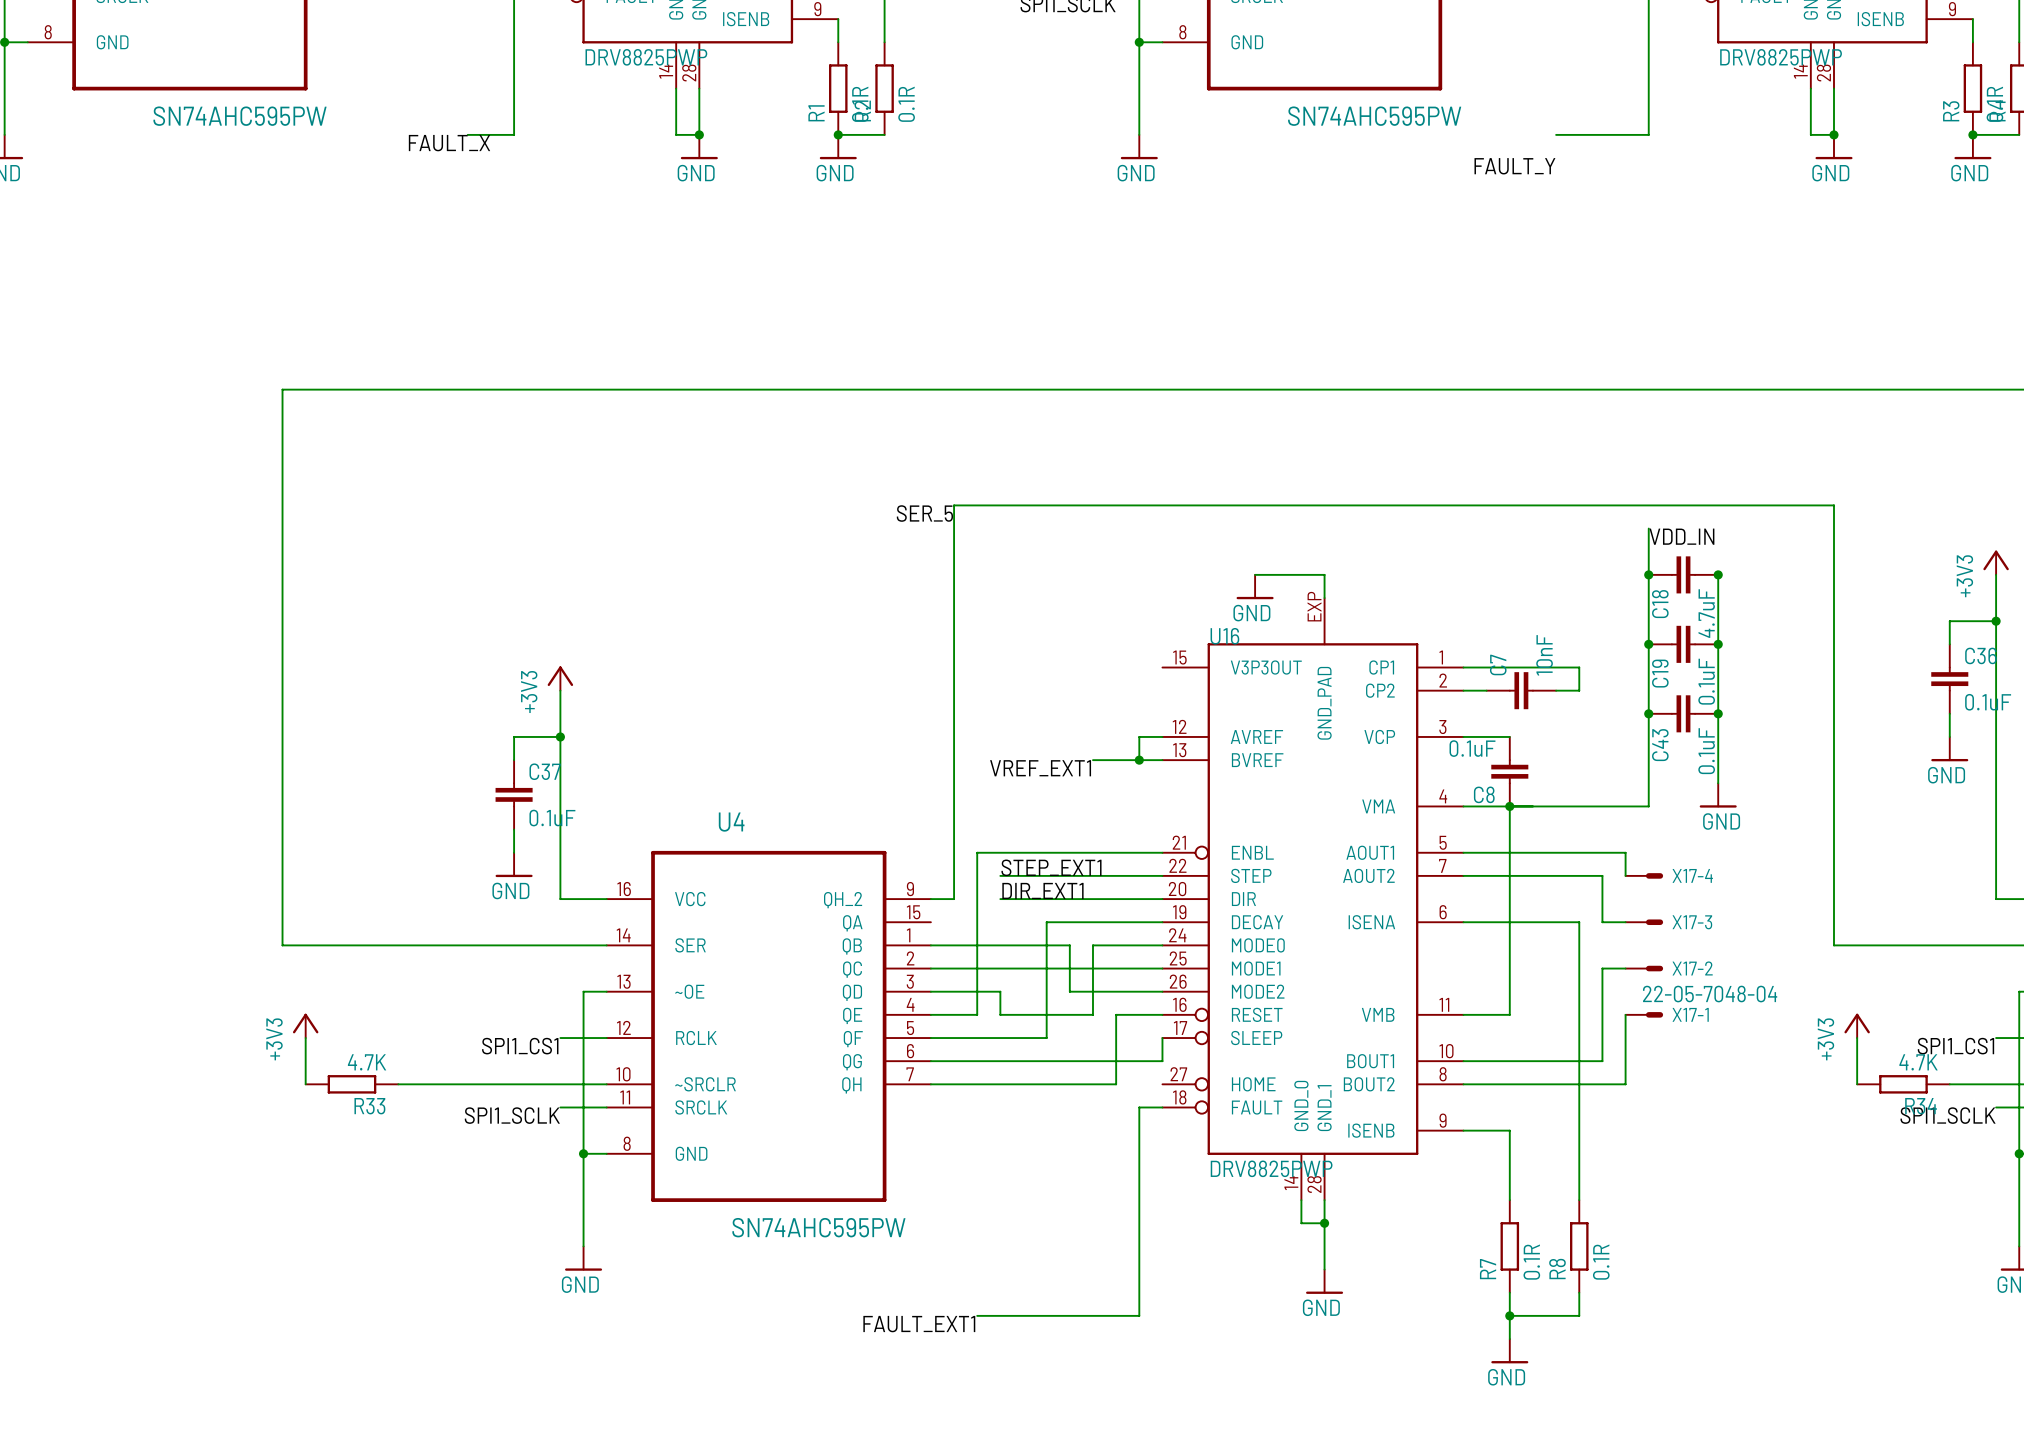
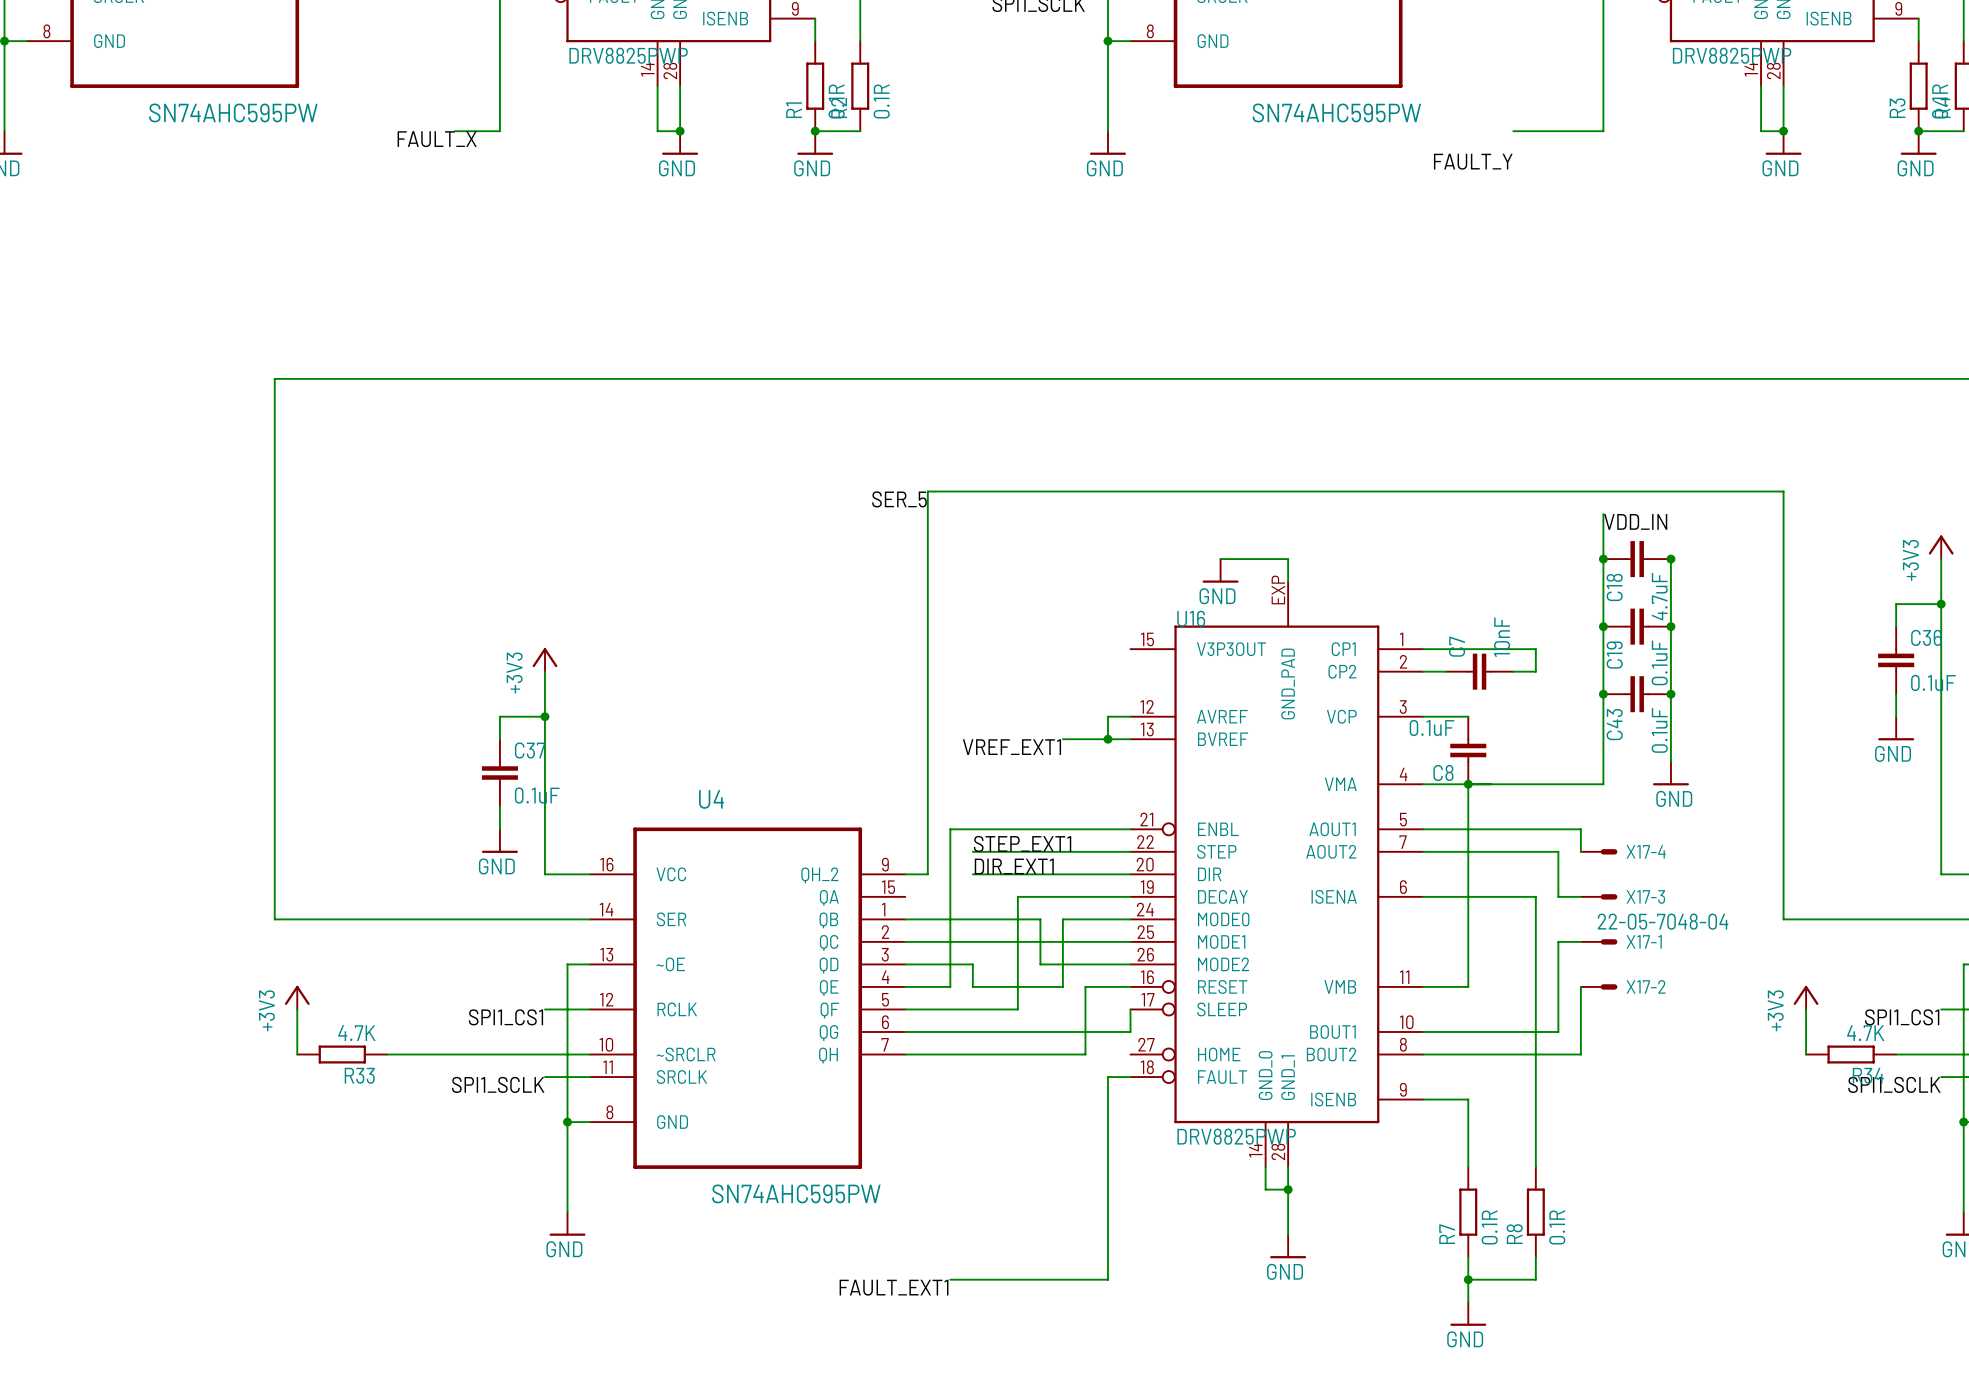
X17-2 value: none -> 22-05-7048-04 (1663, 921)
X17-2 name: X17-2 (1692, 968) -> X17-1 (1644, 941)
X17-1 value: 22-05-7048-04 (1710, 994) -> none
X17-1 name: X17-1 (1690, 1014) -> X17-2 (1646, 986)

